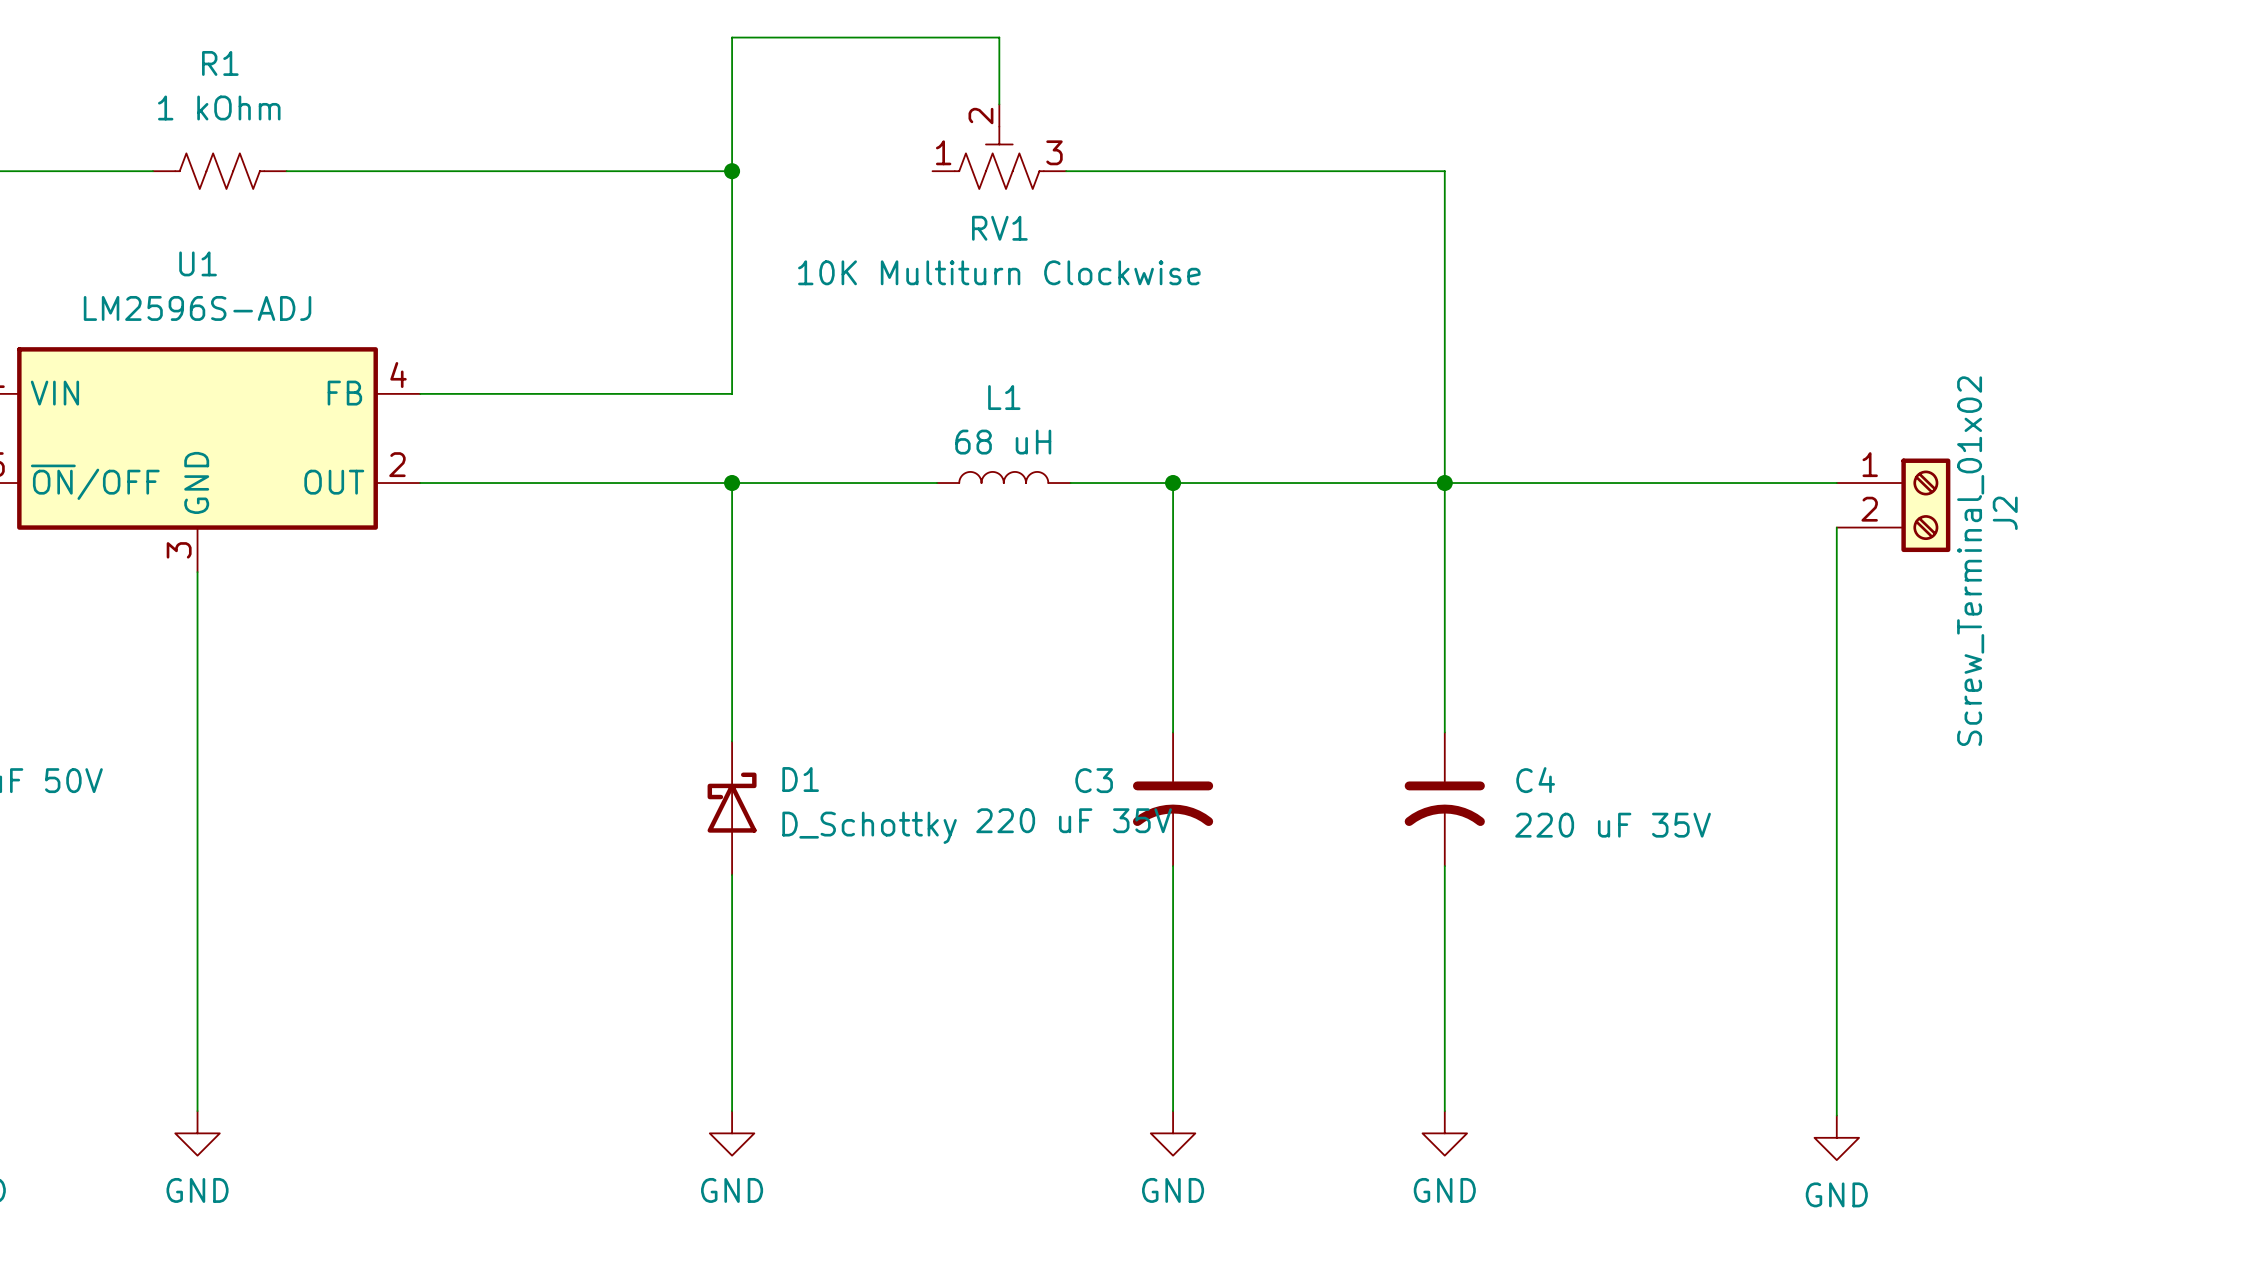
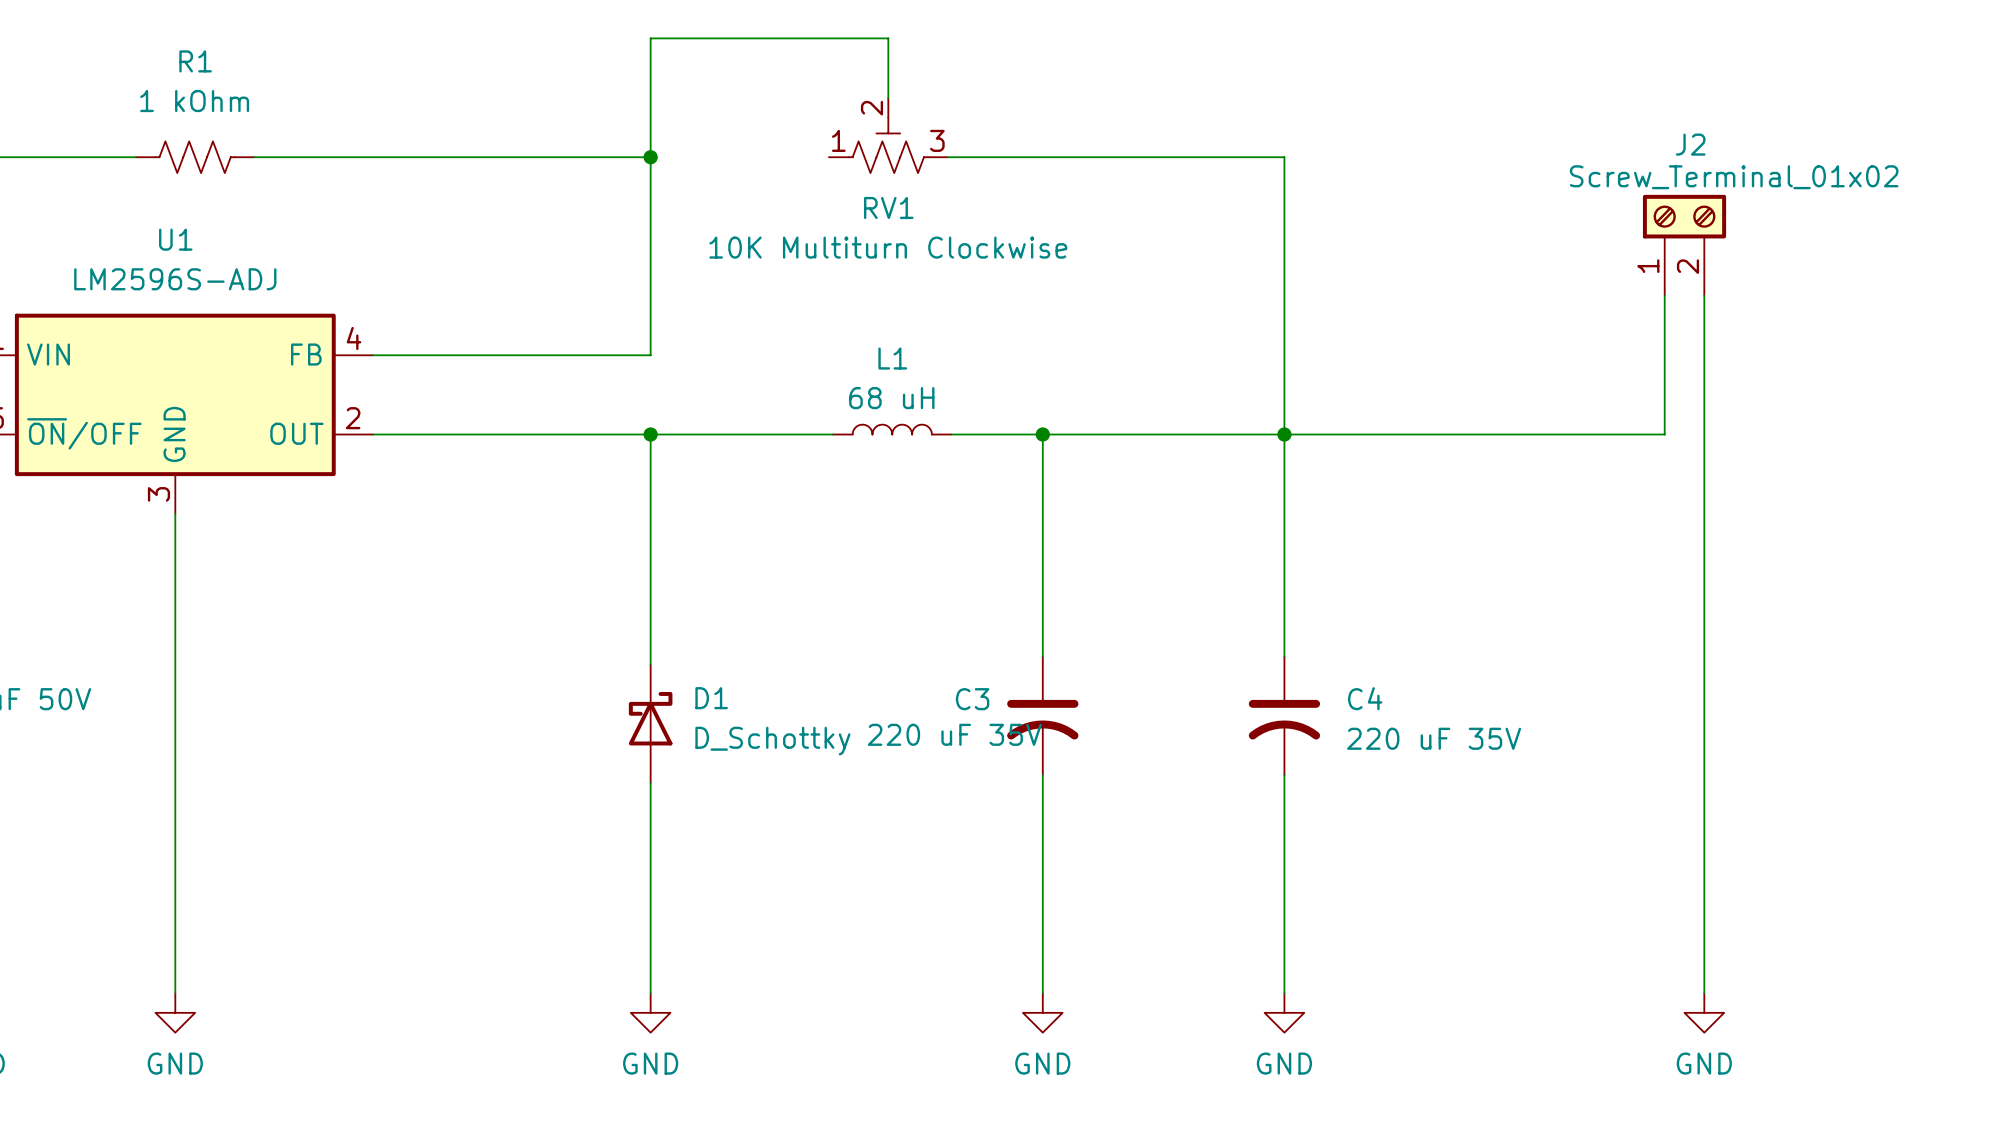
wire: none -> (1664, 295) (1664, 434) (1633, 434)
wire: none -> (1704, 295) (1704, 993)
J2 position: (1893, 505) -> (1684, 245)
J2 rotation: 0° (1925, 505) -> 90° counterclockwise (1684, 216)
wire: (1836, 527) (1836, 1115) -> none
power symbol position: GND (1836, 1137) -> GND (1704, 1012)

